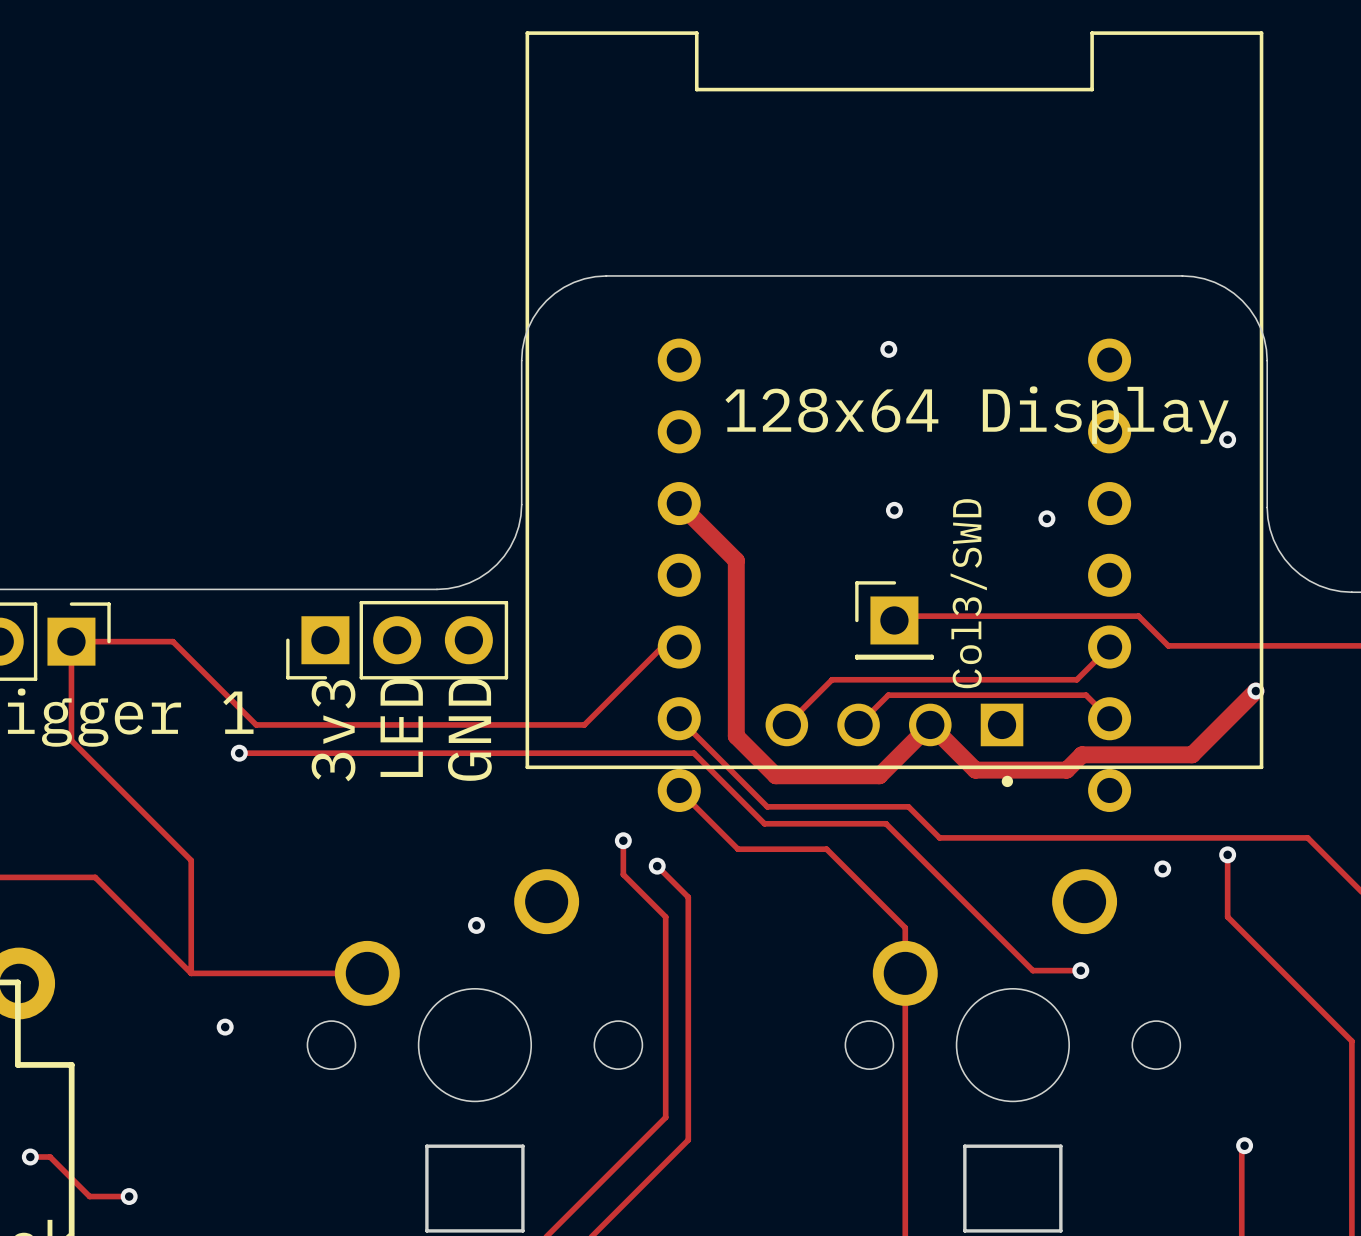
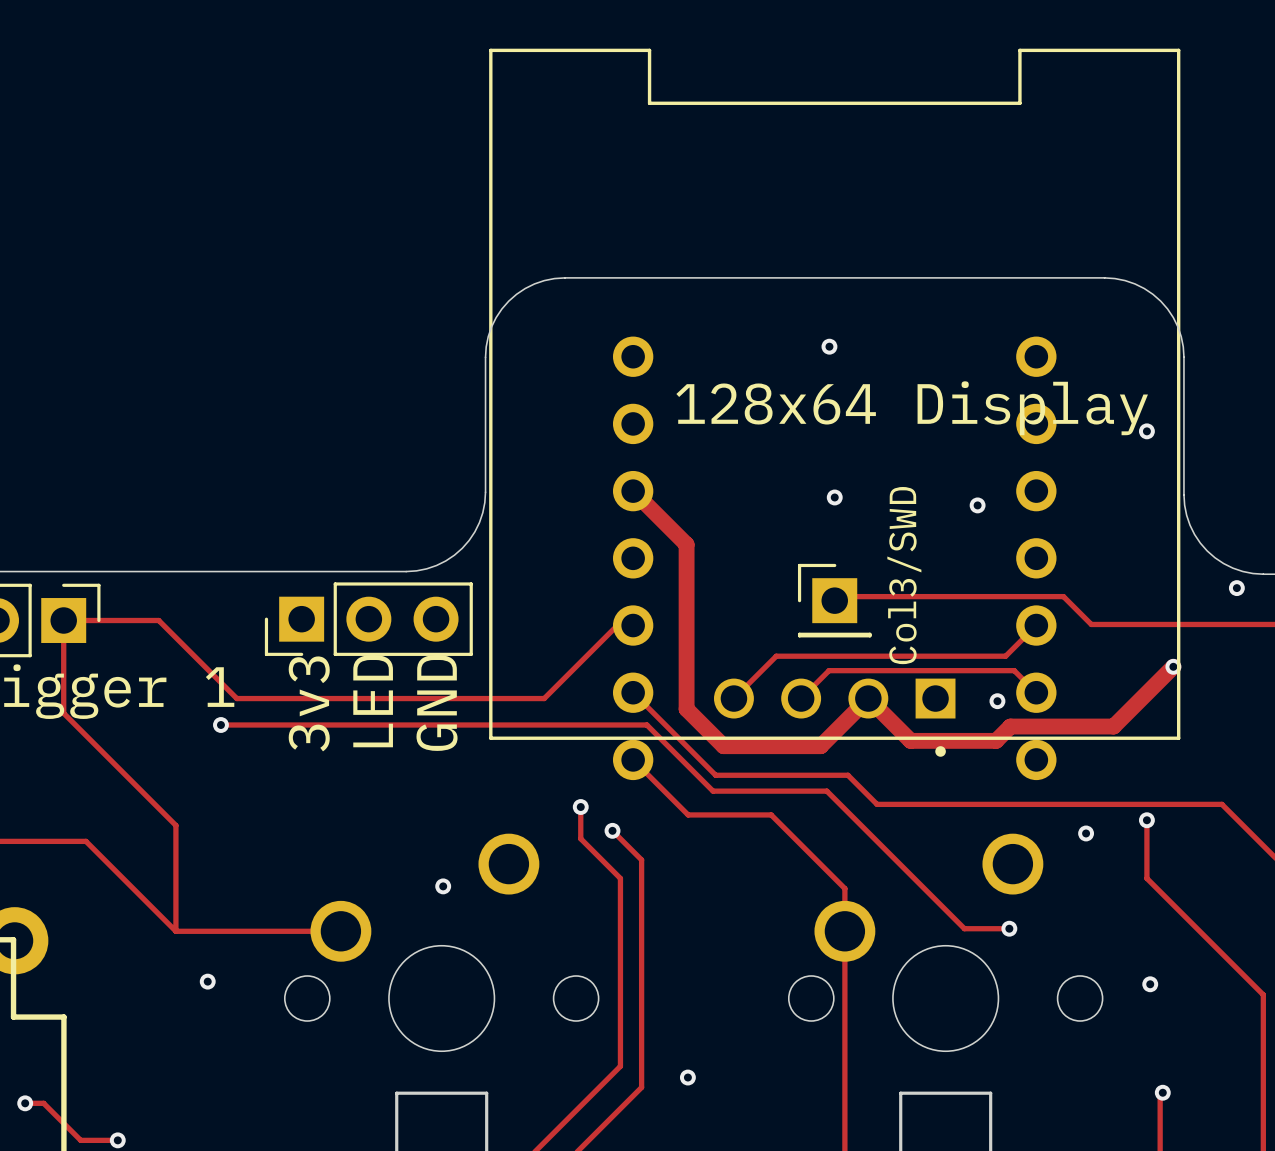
via: none -> (1236, 588)
via: none -> (997, 701)
via: none -> (1150, 984)
via: none -> (687, 1077)

